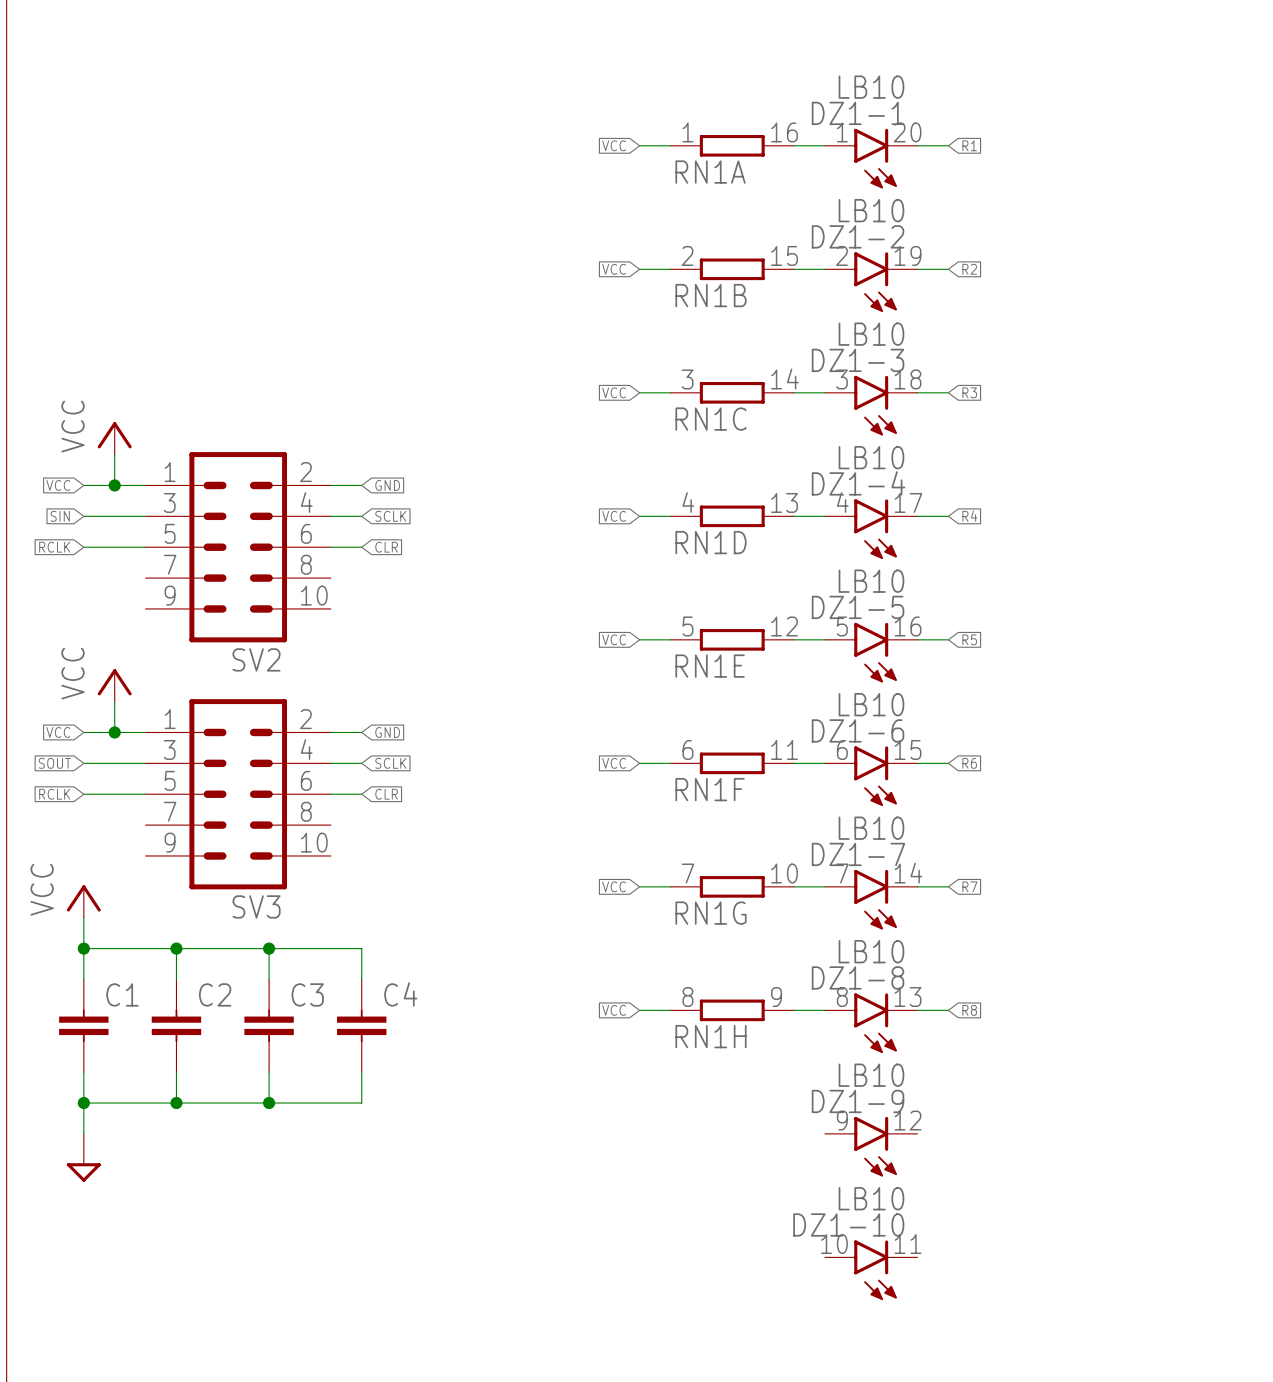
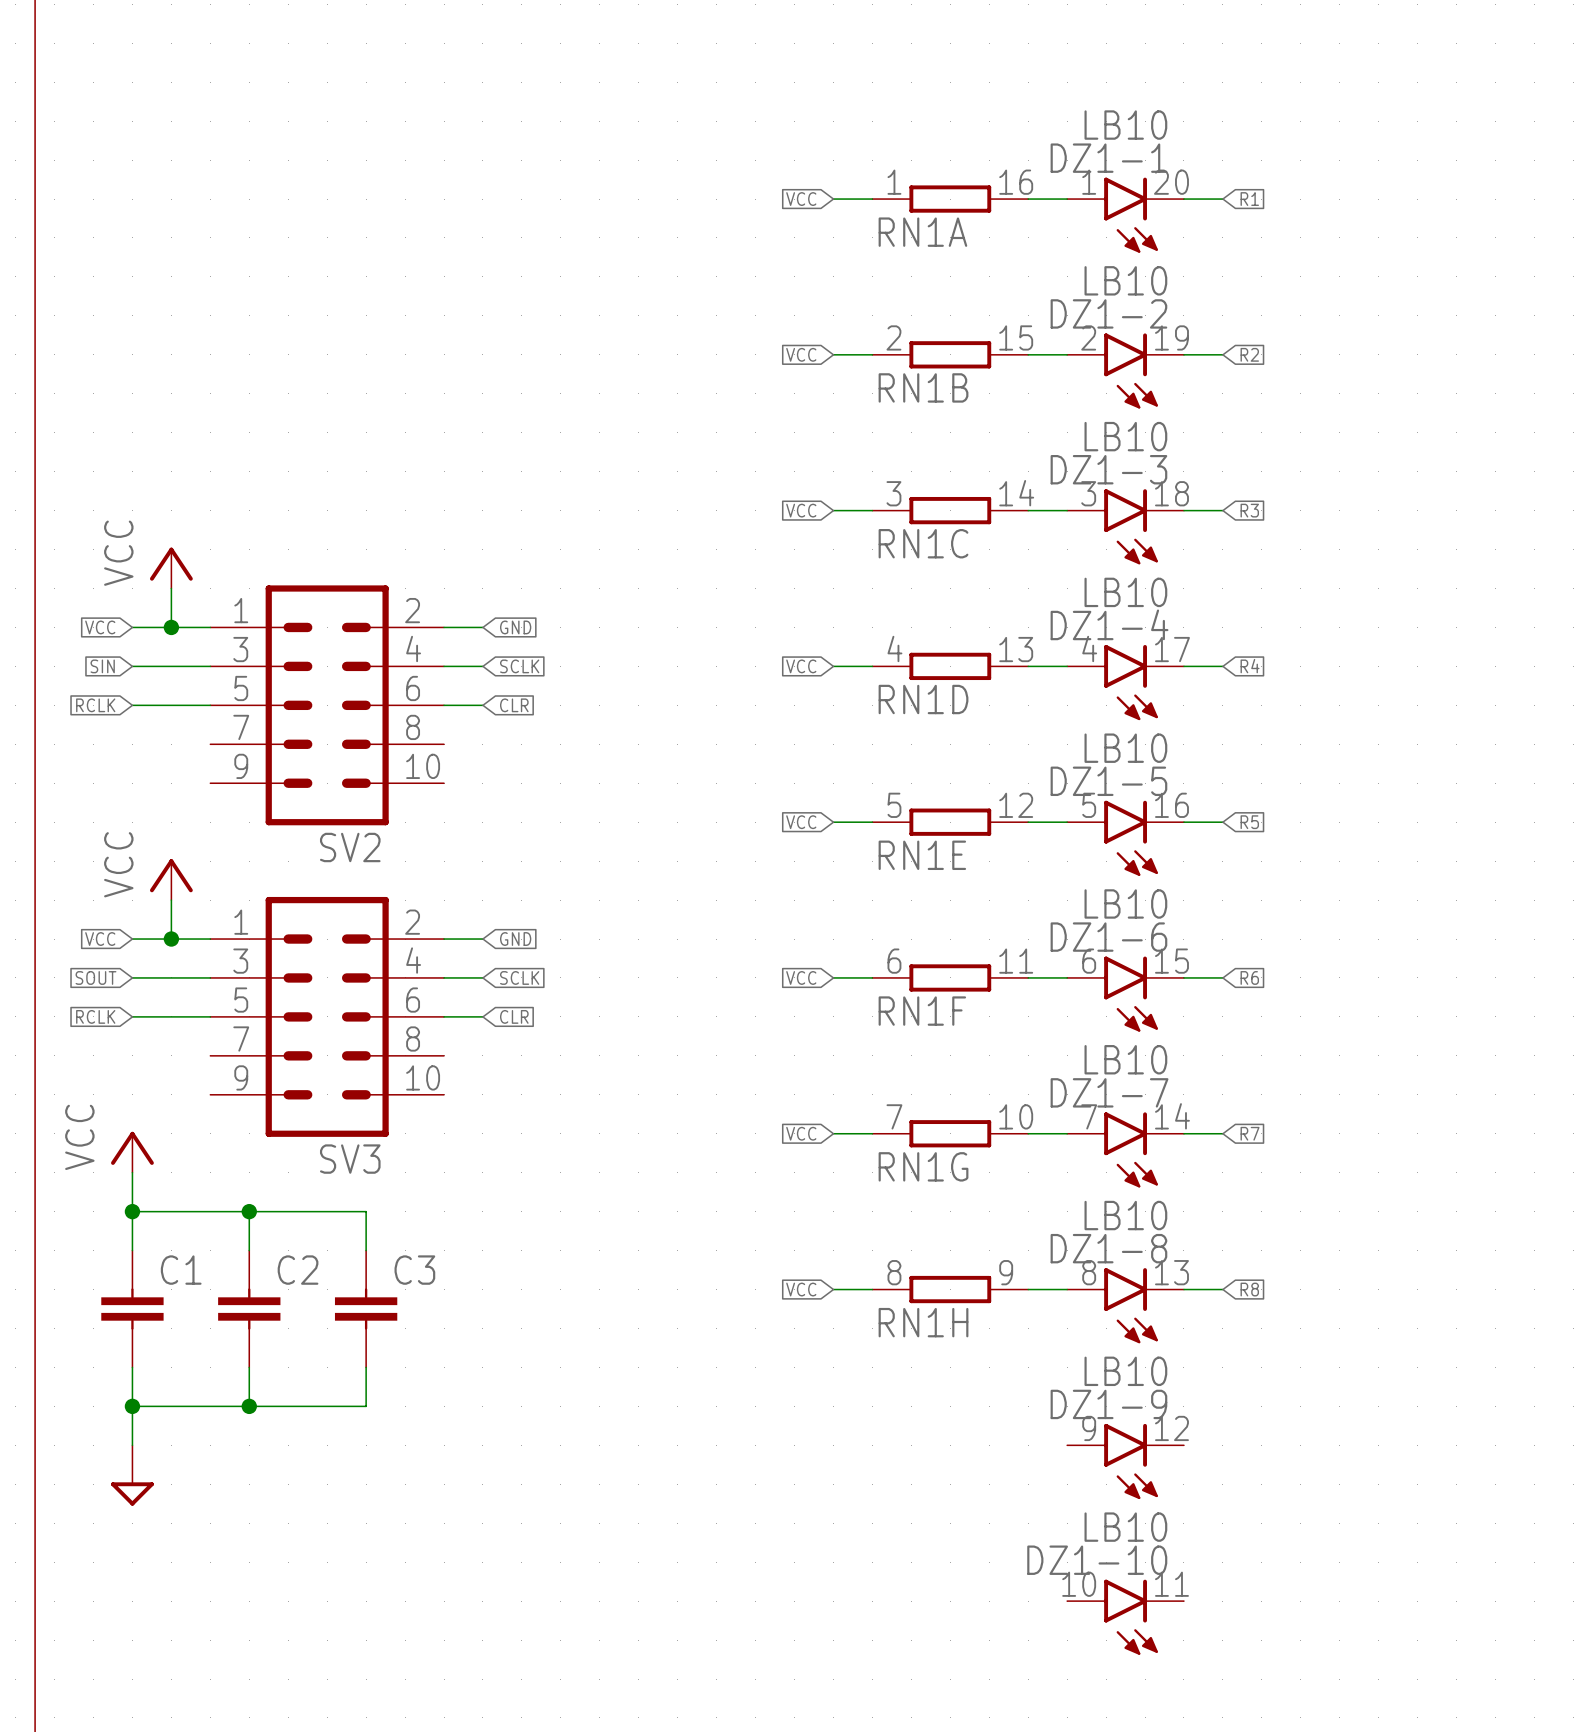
wire: (269, 948) (361, 948) (361, 979) -> none
junction: (269, 948) -> none
C4: (361, 1025) -> none
wire: (361, 1072) (361, 1103) (269, 1103) -> none
junction: (269, 1103) -> none

